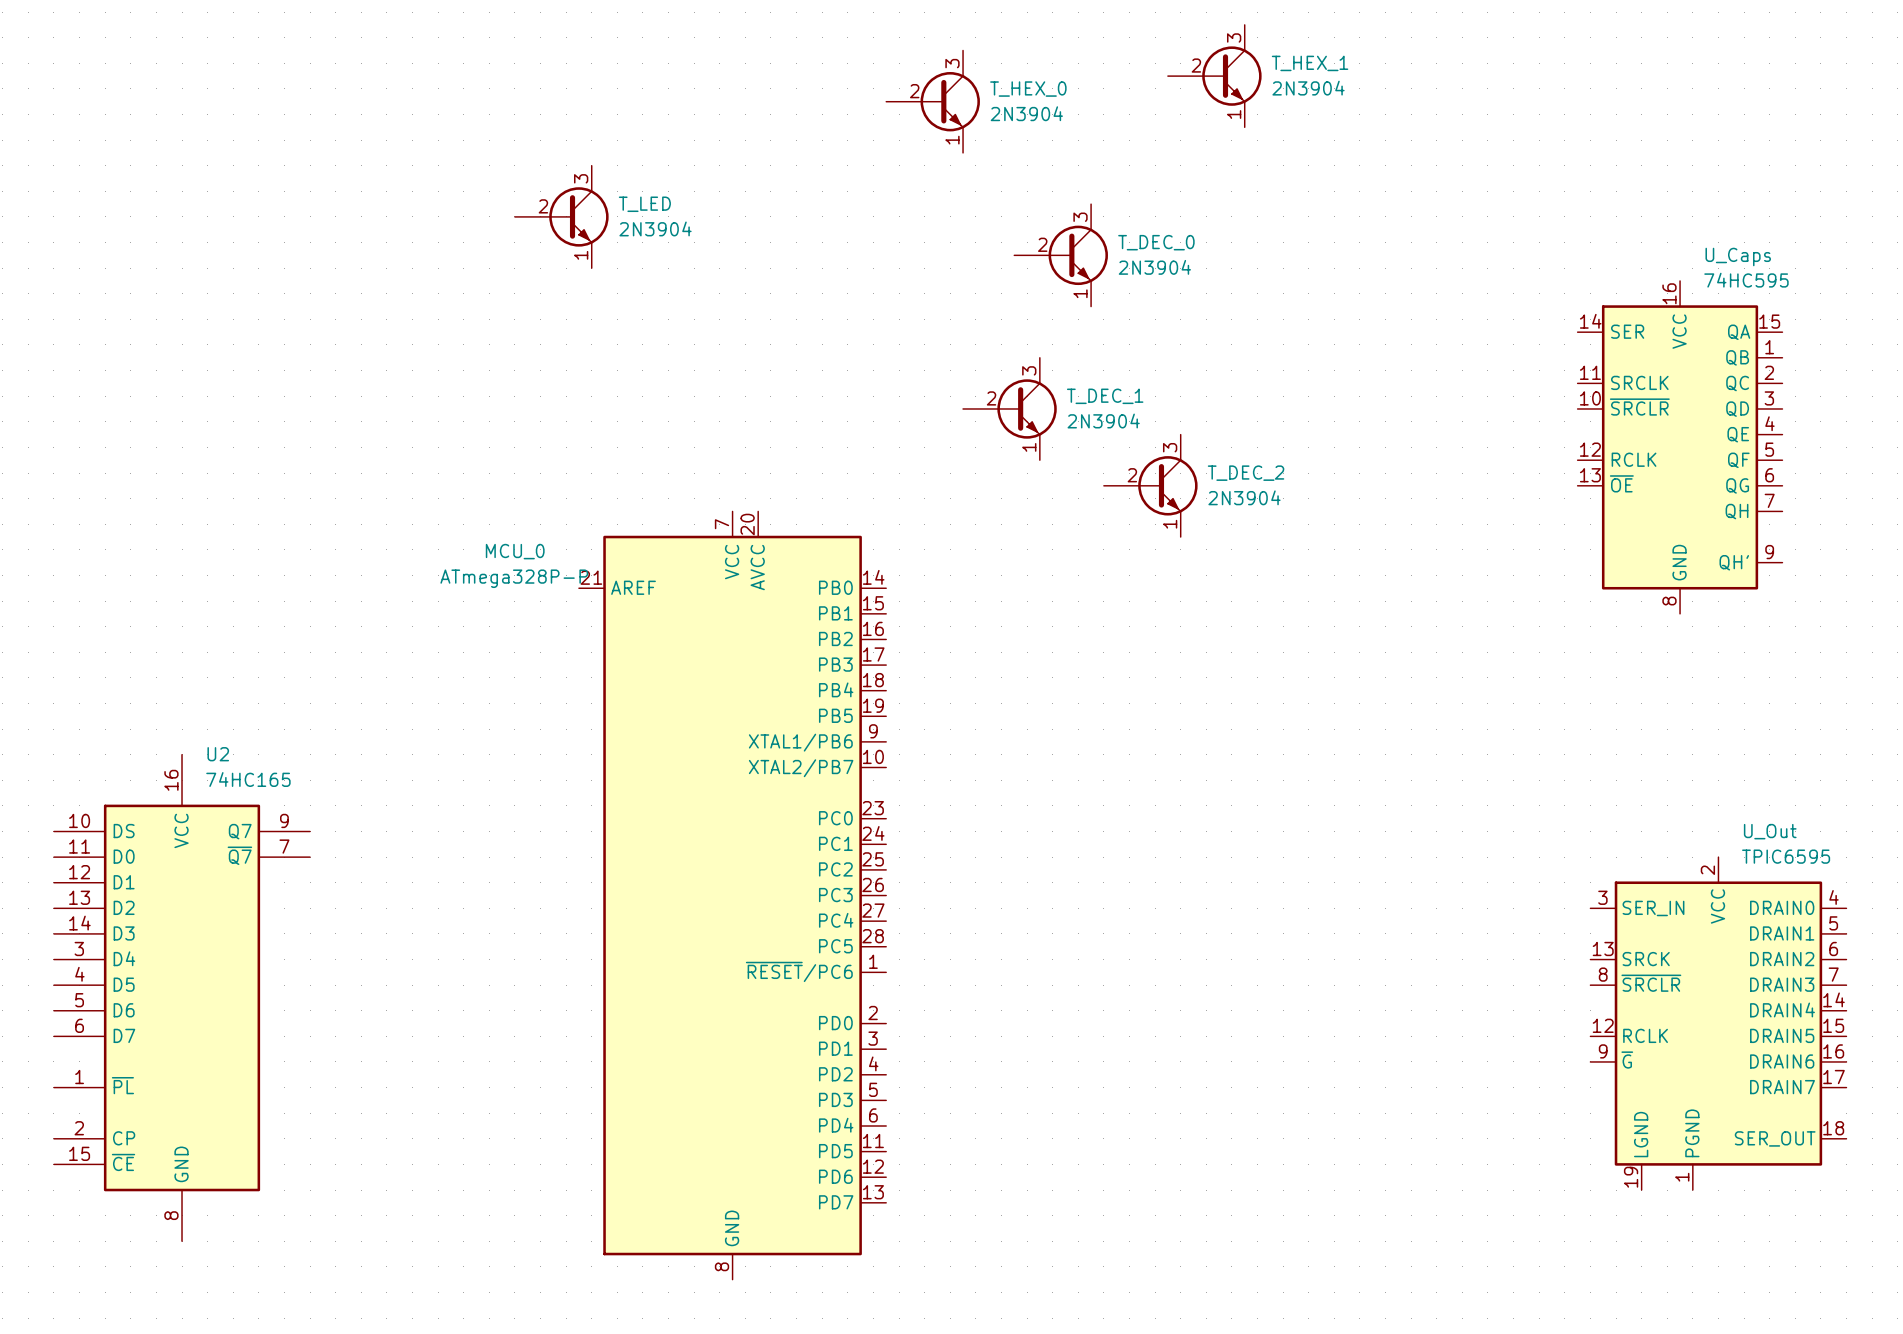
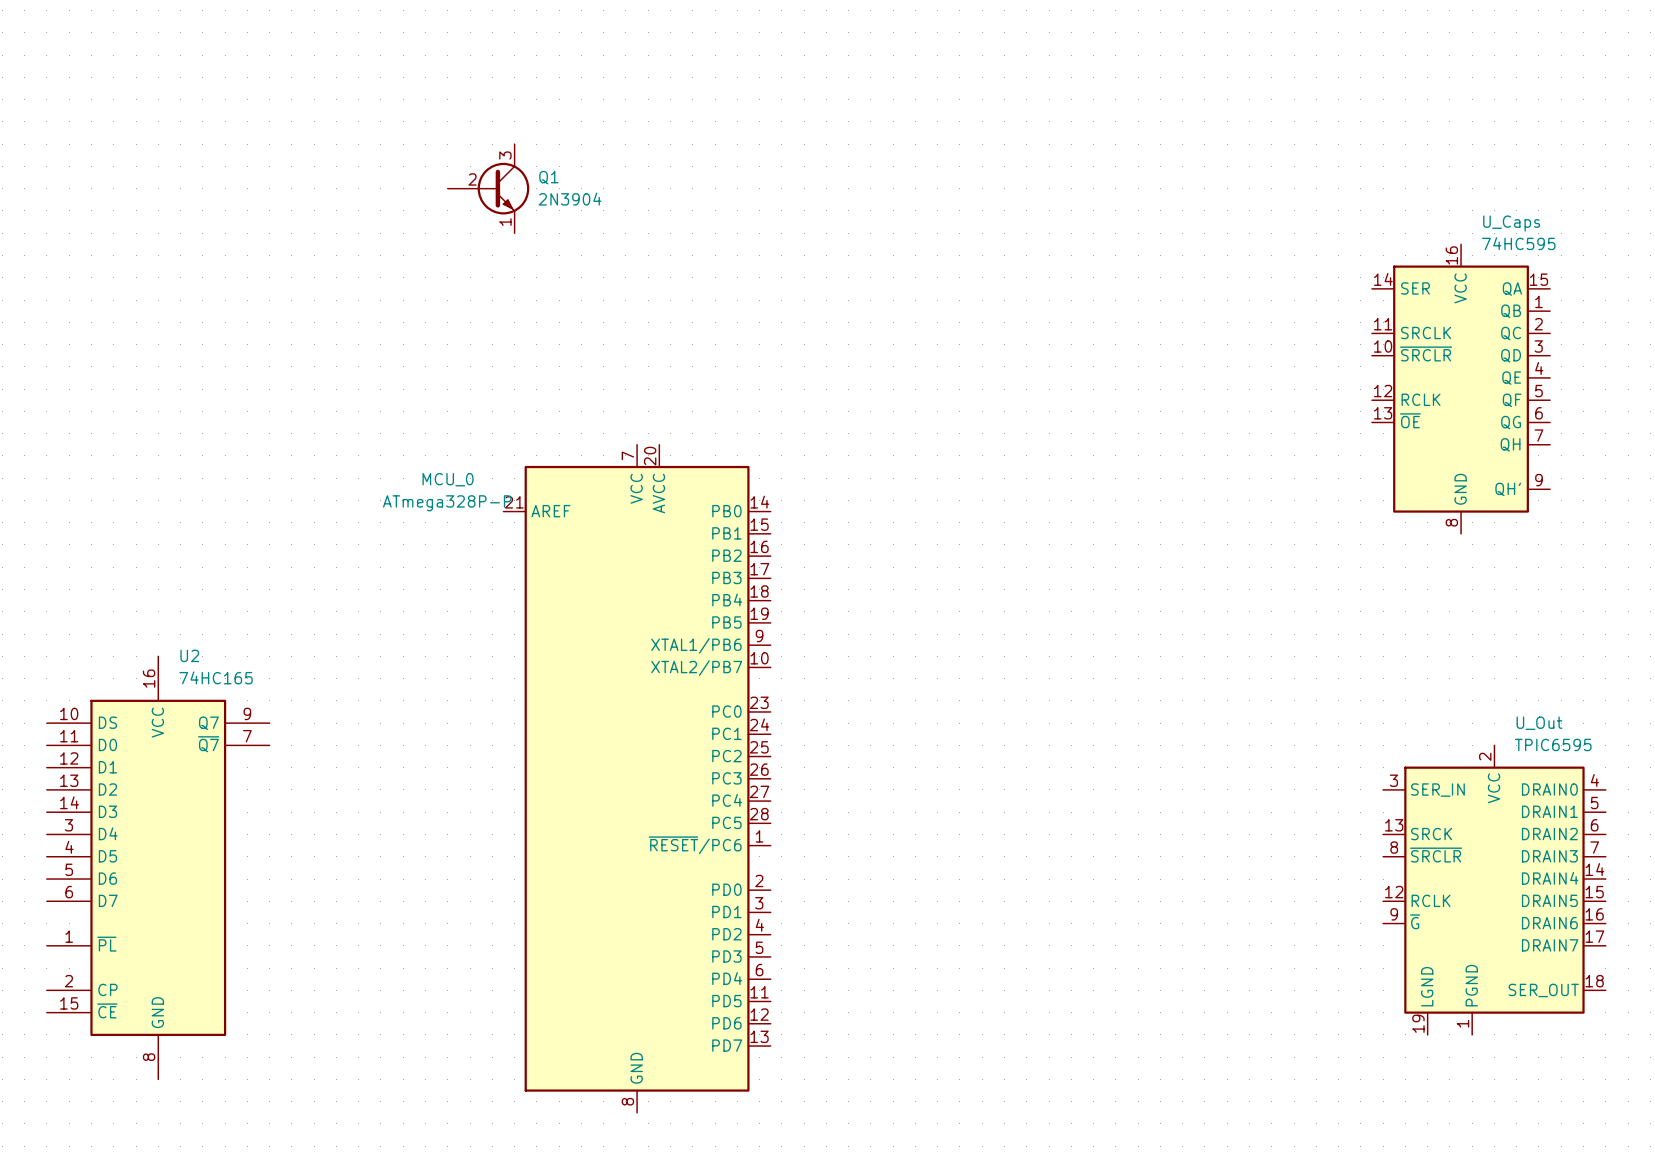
T_HEX_1: 2N3904 (1214, 76) -> none
T_HEX_0: 2N3904 (933, 101) -> none
T_LED name: T_LED (644, 204) -> Q1 (548, 177)
T_DEC_0: 2N3904 (1061, 255) -> none
T_DEC_1: 2N3904 (1009, 408) -> none
T_DEC_2: 2N3904 (1150, 485) -> none

